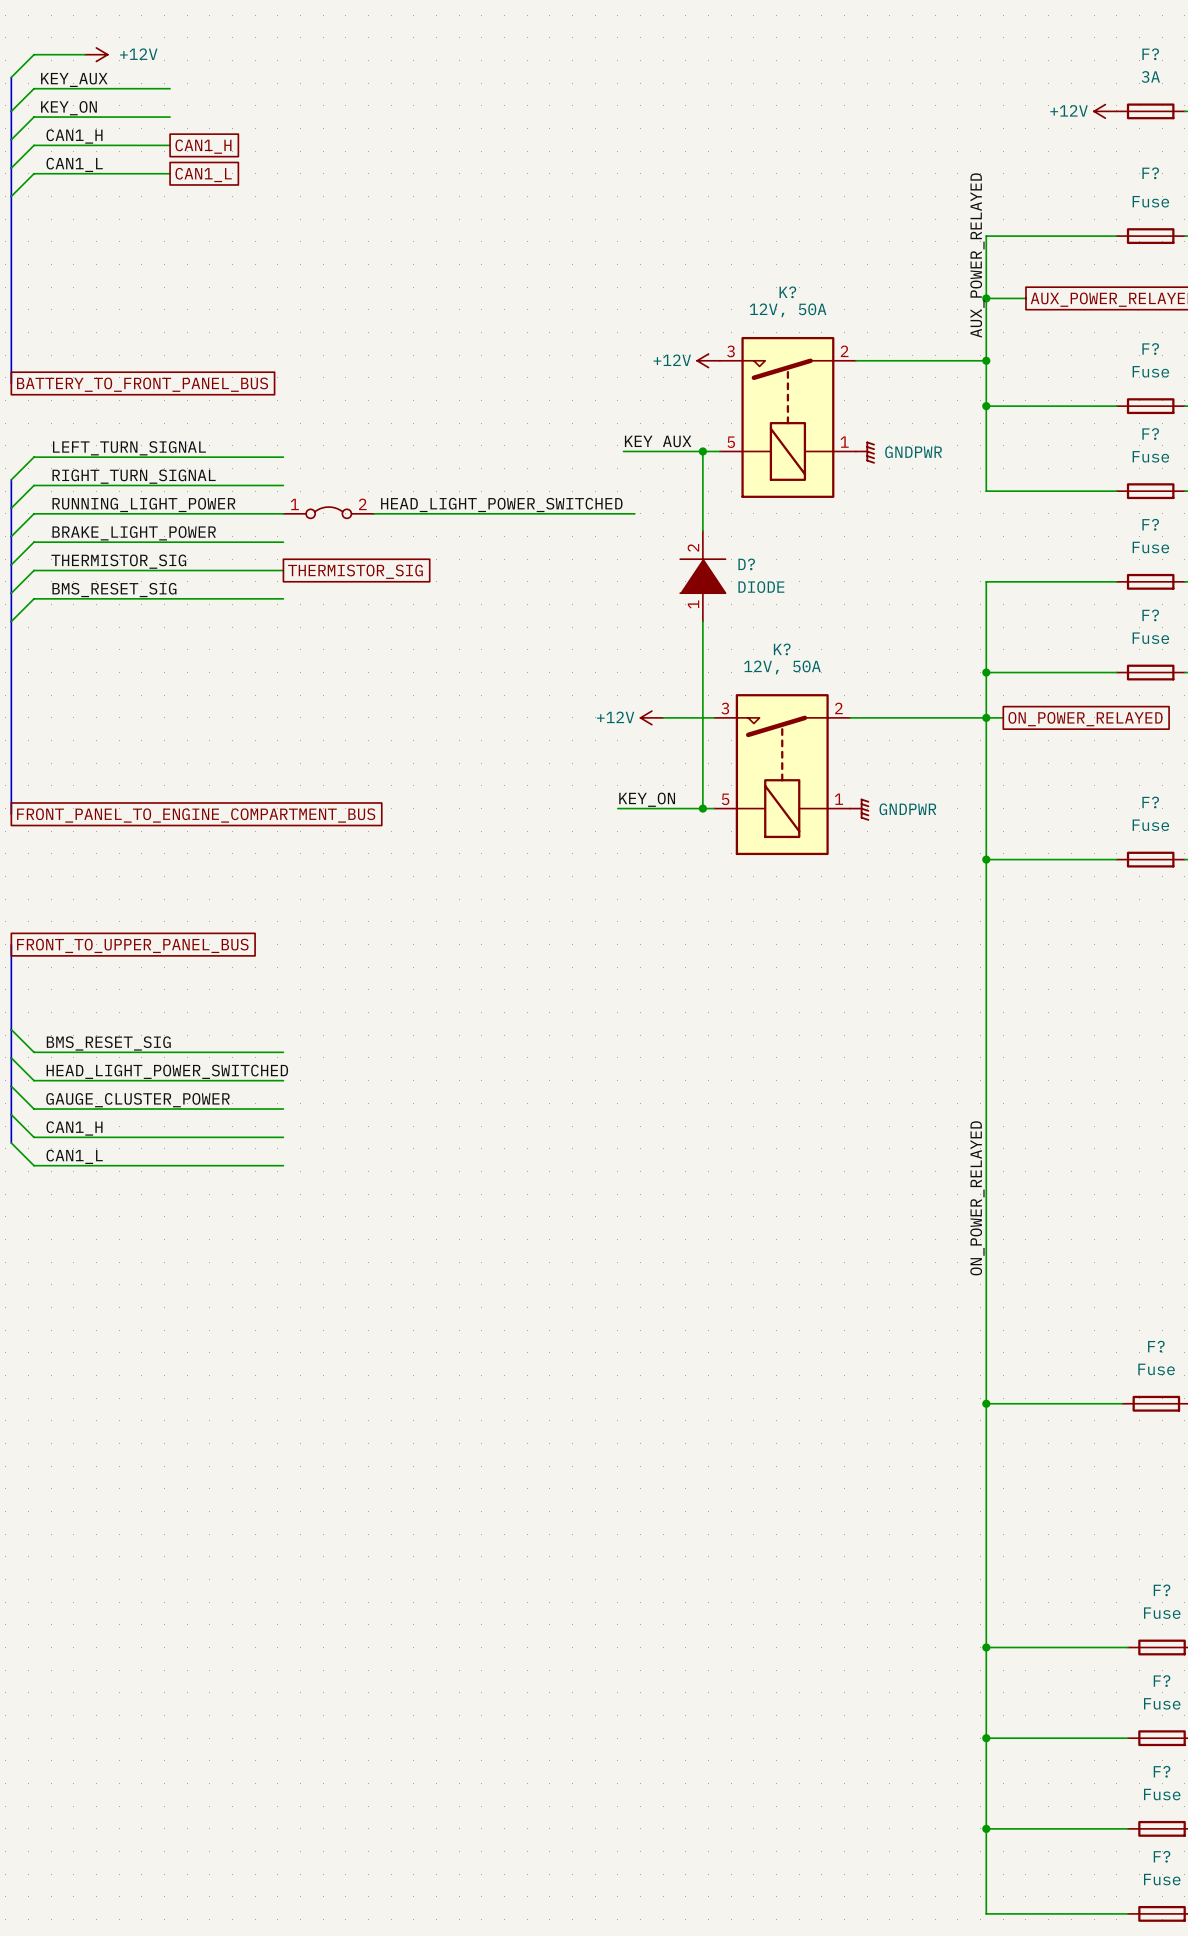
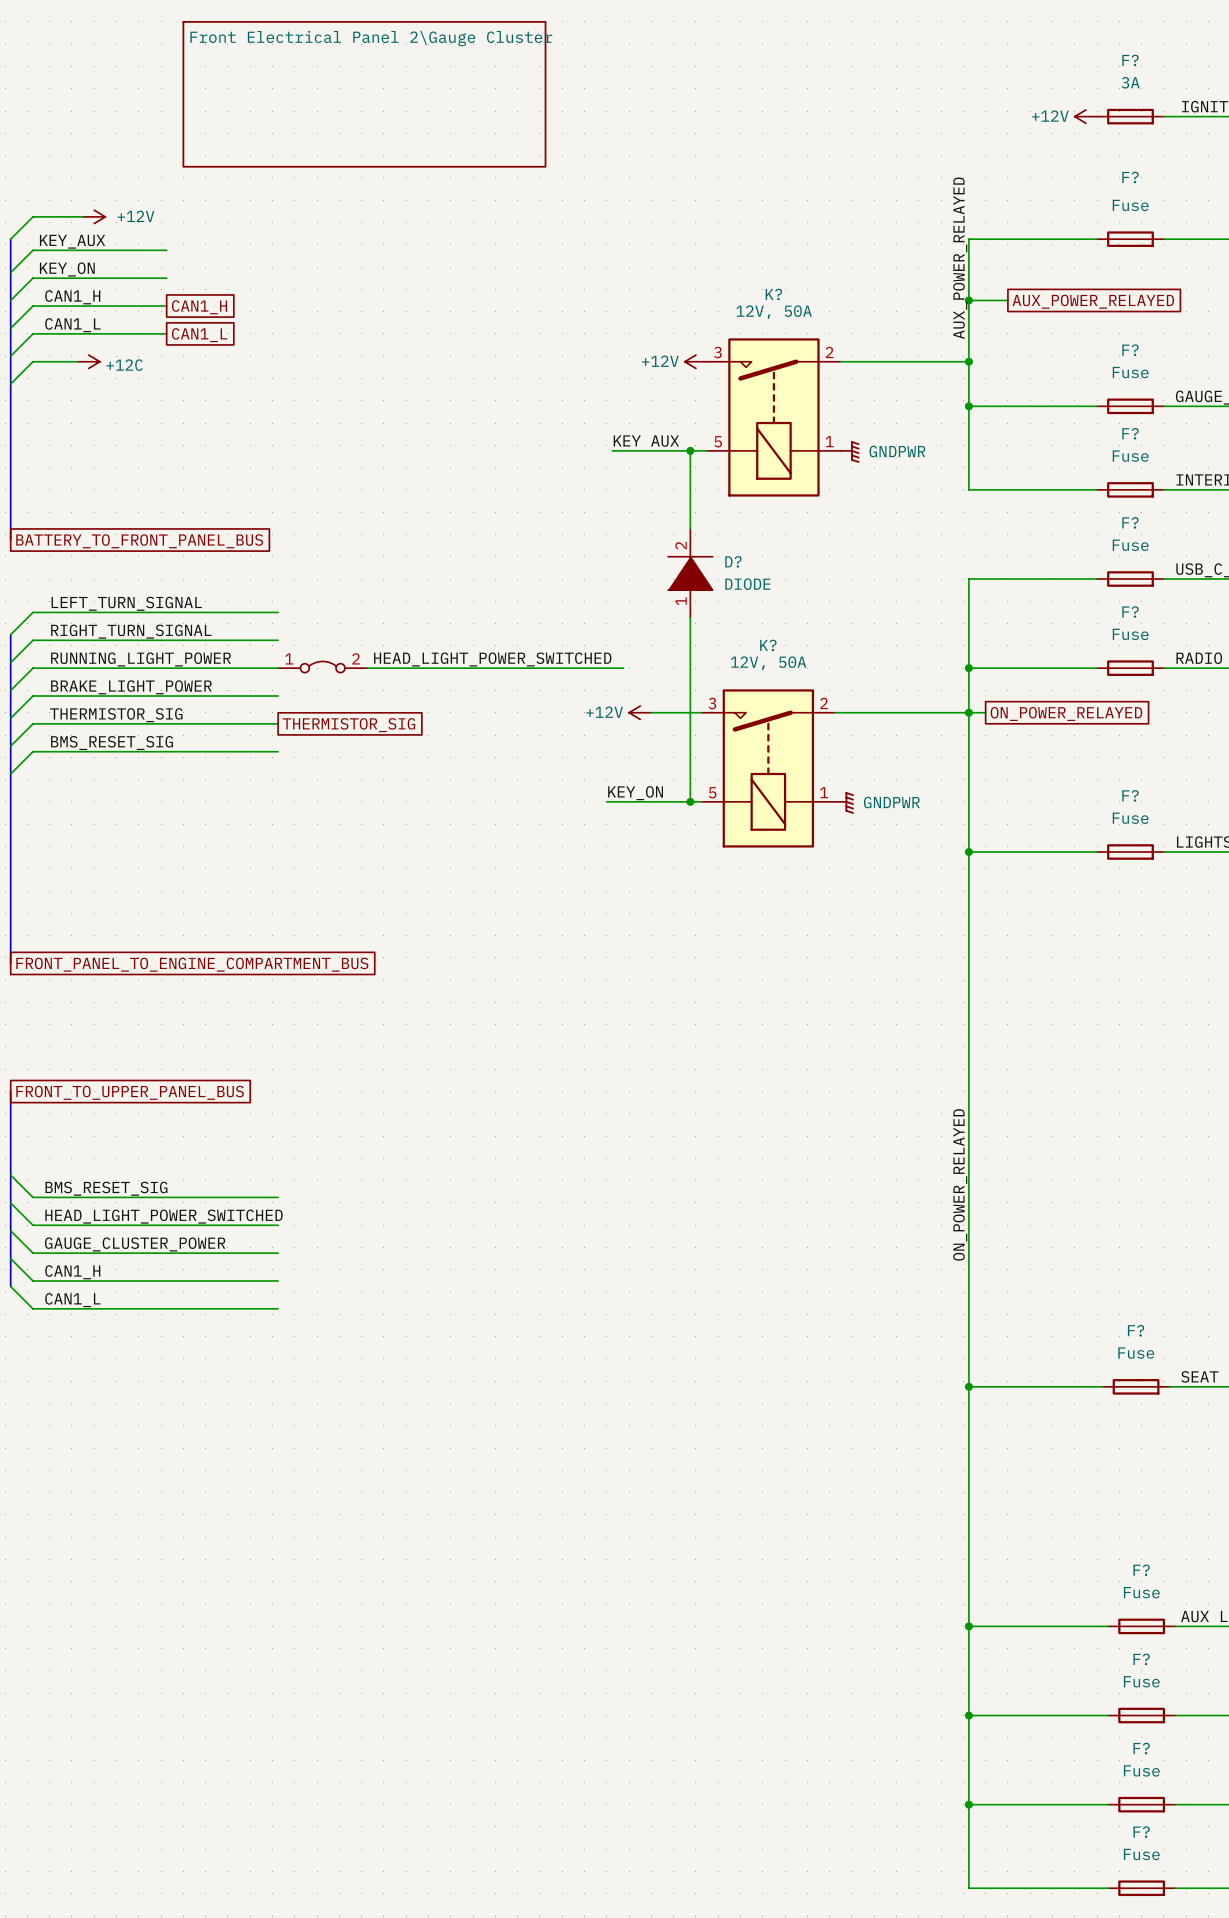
wire: (85, 54) (34, 54) (11, 77) -> none
power symbol position: +12V (96, 54) -> +12V (94, 216)
bus: (11, 77) (11, 236) -> none
label position: KEY_AUX (74, 79) -> KEY_AUX (72, 241)
wire: (34, 88) (11, 111) -> (32, 216) (10, 239)
wire: (34, 88) (170, 88) -> none
sheet Front Electrical Panel 2\Gauge Cluster: none -> (364, 94)
label position: KEY_ON (68, 108) -> KEY_ON (67, 269)
wire: (170, 117) (34, 117) (11, 139) -> (166, 278) (32, 278) (10, 300)
label position: CAN1_H (74, 136) -> CAN1_H (72, 297)
wire: (170, 145) (34, 145) (11, 168) -> (166, 306) (32, 306) (10, 328)
global label position: CAN1_H (203, 146) -> CAN1_H (199, 307)
label position: CAN1_L (74, 164) -> CAN1_L (72, 325)
wire: (170, 173) (34, 173) (11, 196) -> (166, 333) (32, 333) (10, 356)
global label position: CAN1_L (203, 175) -> CAN1_L (199, 335)
wire: none -> (32, 216) (83, 216)
wire: none -> (166, 250) (32, 250) (10, 272)
wire: none -> (77, 361) (32, 361) (10, 384)
power symbol: none -> +12C (88, 361)
global label position: BATTERY_TO_FRONT_PANEL_BUS (142, 384) -> BATTERY_TO_FRONT_PANEL_BUS (139, 541)
label position: LEFT_TURN_SIGNAL (129, 448) -> LEFT_TURN_SIGNAL (126, 603)
wire: (283, 457) (34, 457) (11, 479) -> (278, 612) (32, 612) (10, 634)
label position: RIGHT_TURN_SIGNAL (134, 476) -> RIGHT_TURN_SIGNAL (131, 631)
wire: (34, 485) (11, 508) -> (32, 640) (10, 662)
wire: (34, 485) (283, 485) -> (32, 640) (278, 640)
label position: RUNNING_LIGHT_POWER (143, 504) -> RUNNING_LIGHT_POWER (140, 659)
label position: HEAD_LIGHT_POWER_SWITCHED (501, 504) -> HEAD_LIGHT_POWER_SWITCHED (492, 659)
part position: (328, 512) -> (322, 667)
wire: (283, 513) (34, 513) (11, 536) -> (278, 668) (32, 668) (10, 690)
wire: (374, 513) (634, 513) -> (367, 668) (623, 668)
label position: BRAKE_LIGHT_POWER (134, 533) -> BRAKE_LIGHT_POWER (131, 687)
bus: (11, 542) (11, 638) -> (10, 384) (10, 478)
wire: (283, 542) (34, 542) (11, 564) -> (278, 696) (32, 696) (10, 718)
label position: THERMISTOR_SIG (118, 561) -> THERMISTOR_SIG (116, 715)
wire: (283, 570) (34, 570) (11, 593) -> (278, 723) (32, 723) (10, 746)
global label position: THERMISTOR_SIG (355, 571) -> THERMISTOR_SIG (348, 725)
label: BMS_RESET_SIG (114, 590) -> none
wire: (34, 598) (11, 621) -> (32, 751) (10, 774)
wire: (34, 598) (283, 598) -> (32, 751) (278, 751)
label: none -> BMS_RESET_SIG (112, 743)
global label position: FRONT_PANEL_TO_ENGINE_COMPARTMENT_BUS (196, 815) -> FRONT_PANEL_TO_ENGINE_COMPARTMENT_BUS (192, 964)
global label position: FRONT_TO_UPPER_PANEL_BUS (132, 945) -> FRONT_TO_UPPER_PANEL_BUS (130, 1092)
bus: (11, 972) (11, 1103) -> (10, 807) (10, 935)
wire: (11, 1029) (34, 1052) (283, 1052) -> (10, 1175) (32, 1197) (278, 1197)
label: BMS_RESET_SIG (108, 1043) -> none
wire: (11, 1057) (34, 1080) (283, 1080) -> (10, 1202) (32, 1225) (278, 1225)
label position: HEAD_LIGHT_POWER_SWITCHED (167, 1071) -> HEAD_LIGHT_POWER_SWITCHED (164, 1216)
wire: (11, 1086) (34, 1109) (283, 1109) -> (10, 1230) (32, 1253) (278, 1253)
label position: GAUGE_CLUSTER_POWER (137, 1100) -> GAUGE_CLUSTER_POWER (135, 1244)
wire: (11, 1114) (34, 1137) (283, 1137) -> (10, 1258) (32, 1280) (278, 1280)
label position: CAN1_H (74, 1128) -> CAN1_H (72, 1272)
wire: (11, 1143) (34, 1165) (283, 1165) -> (10, 1286) (32, 1308) (278, 1308)
bus: none -> (10, 1130) (10, 1286)
label position: CAN1_L (74, 1156) -> CAN1_L (72, 1300)
label: none -> BMS_RESET_SIG (106, 1188)

